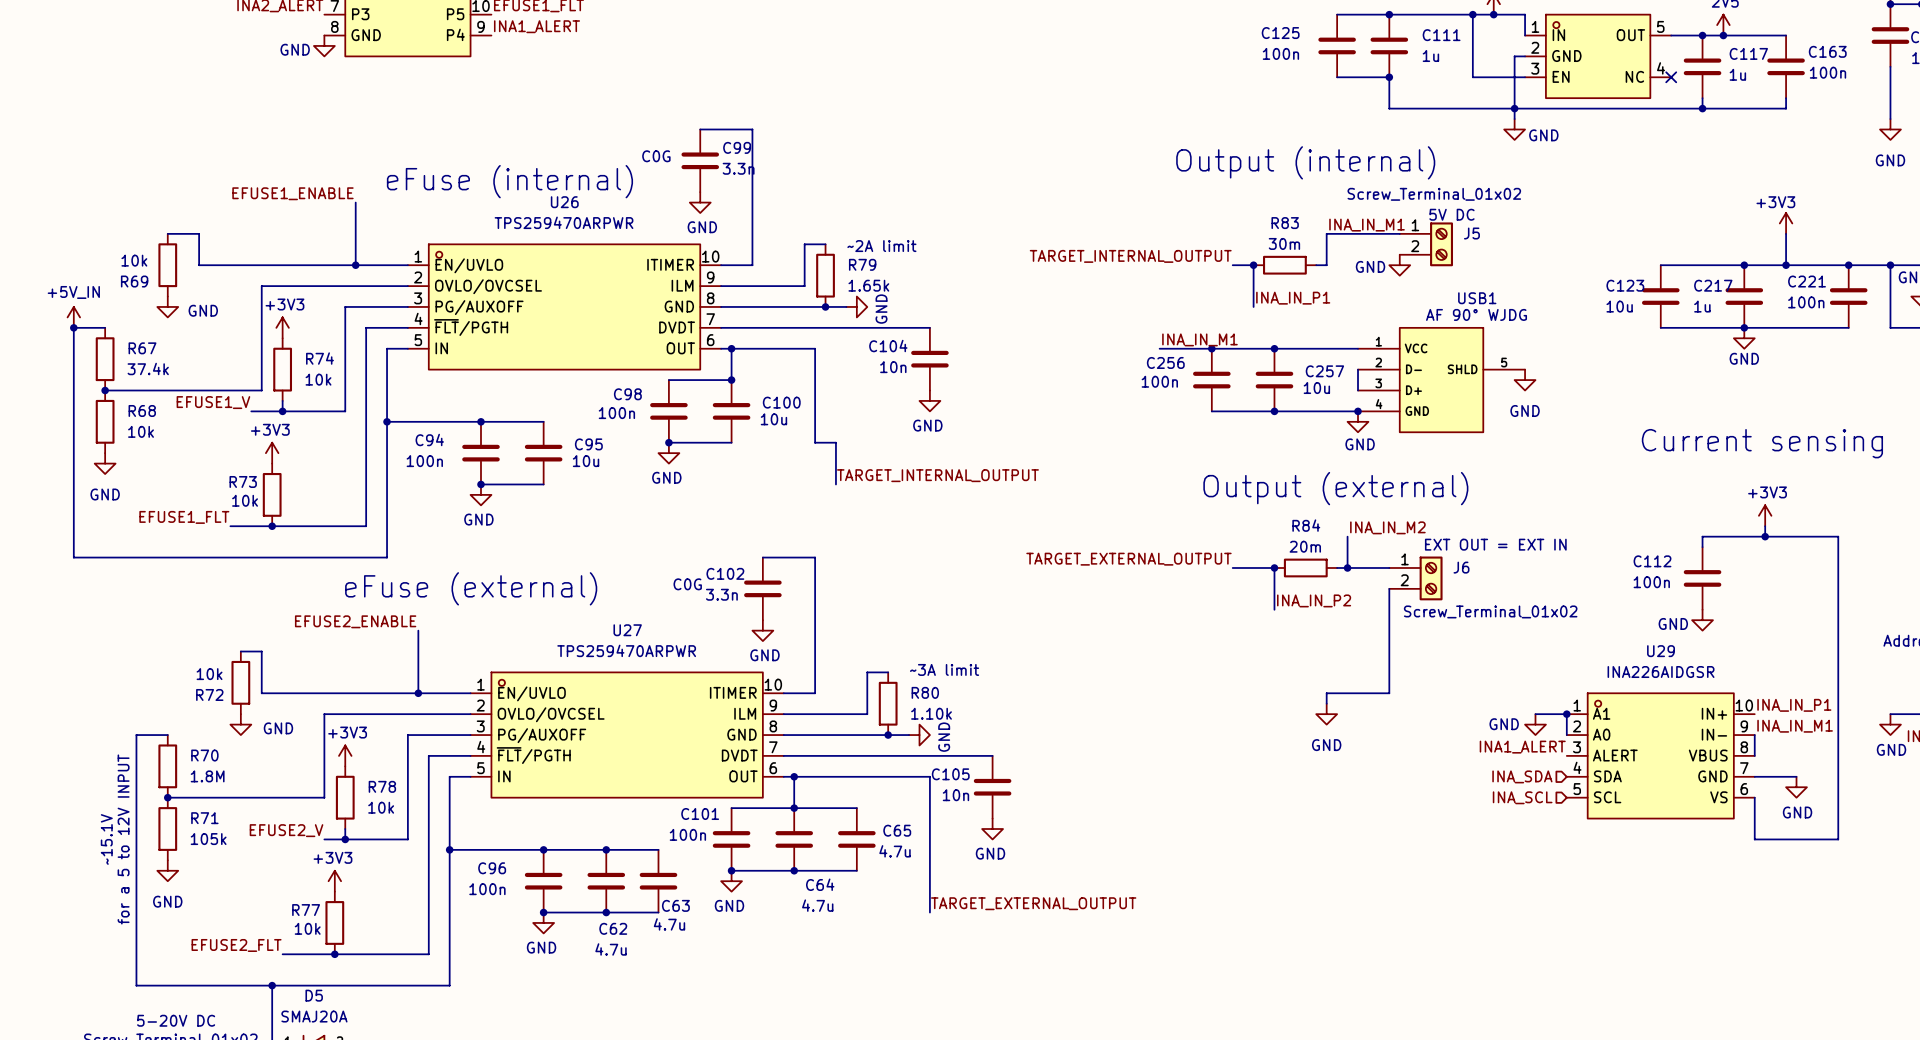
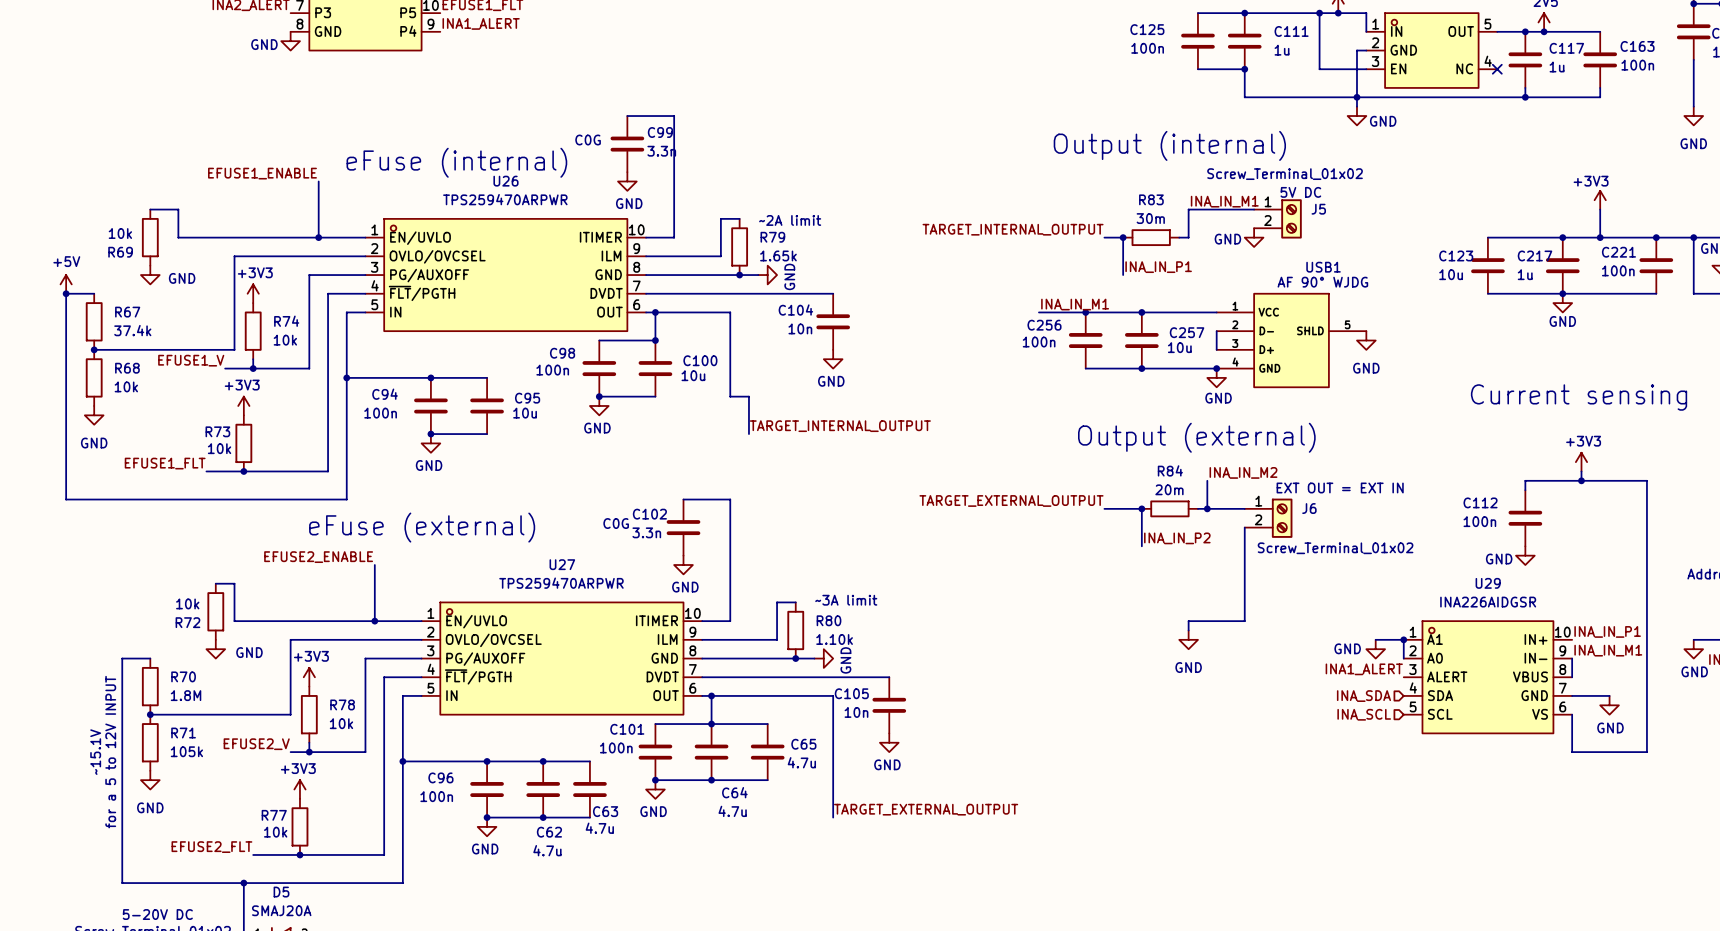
power symbol: +5V_IN (73, 317) -> +5V (66, 284)

